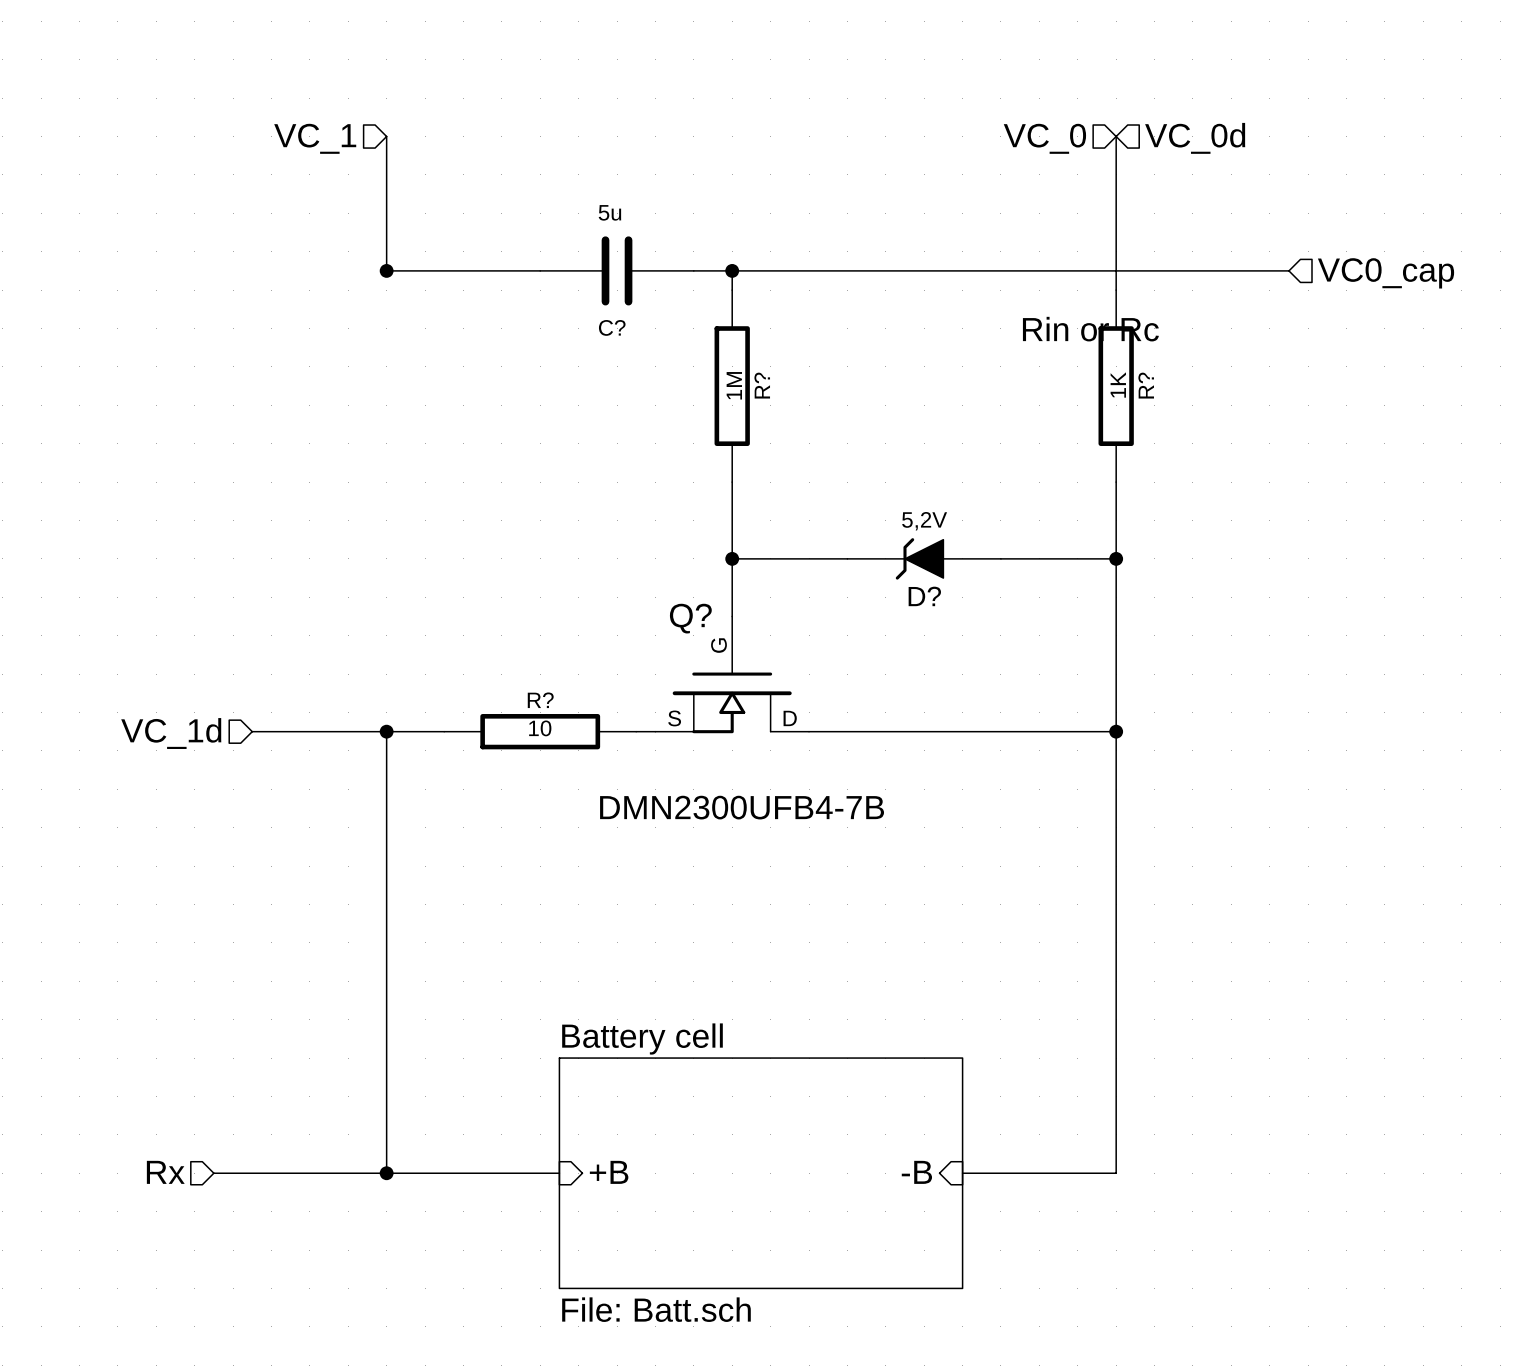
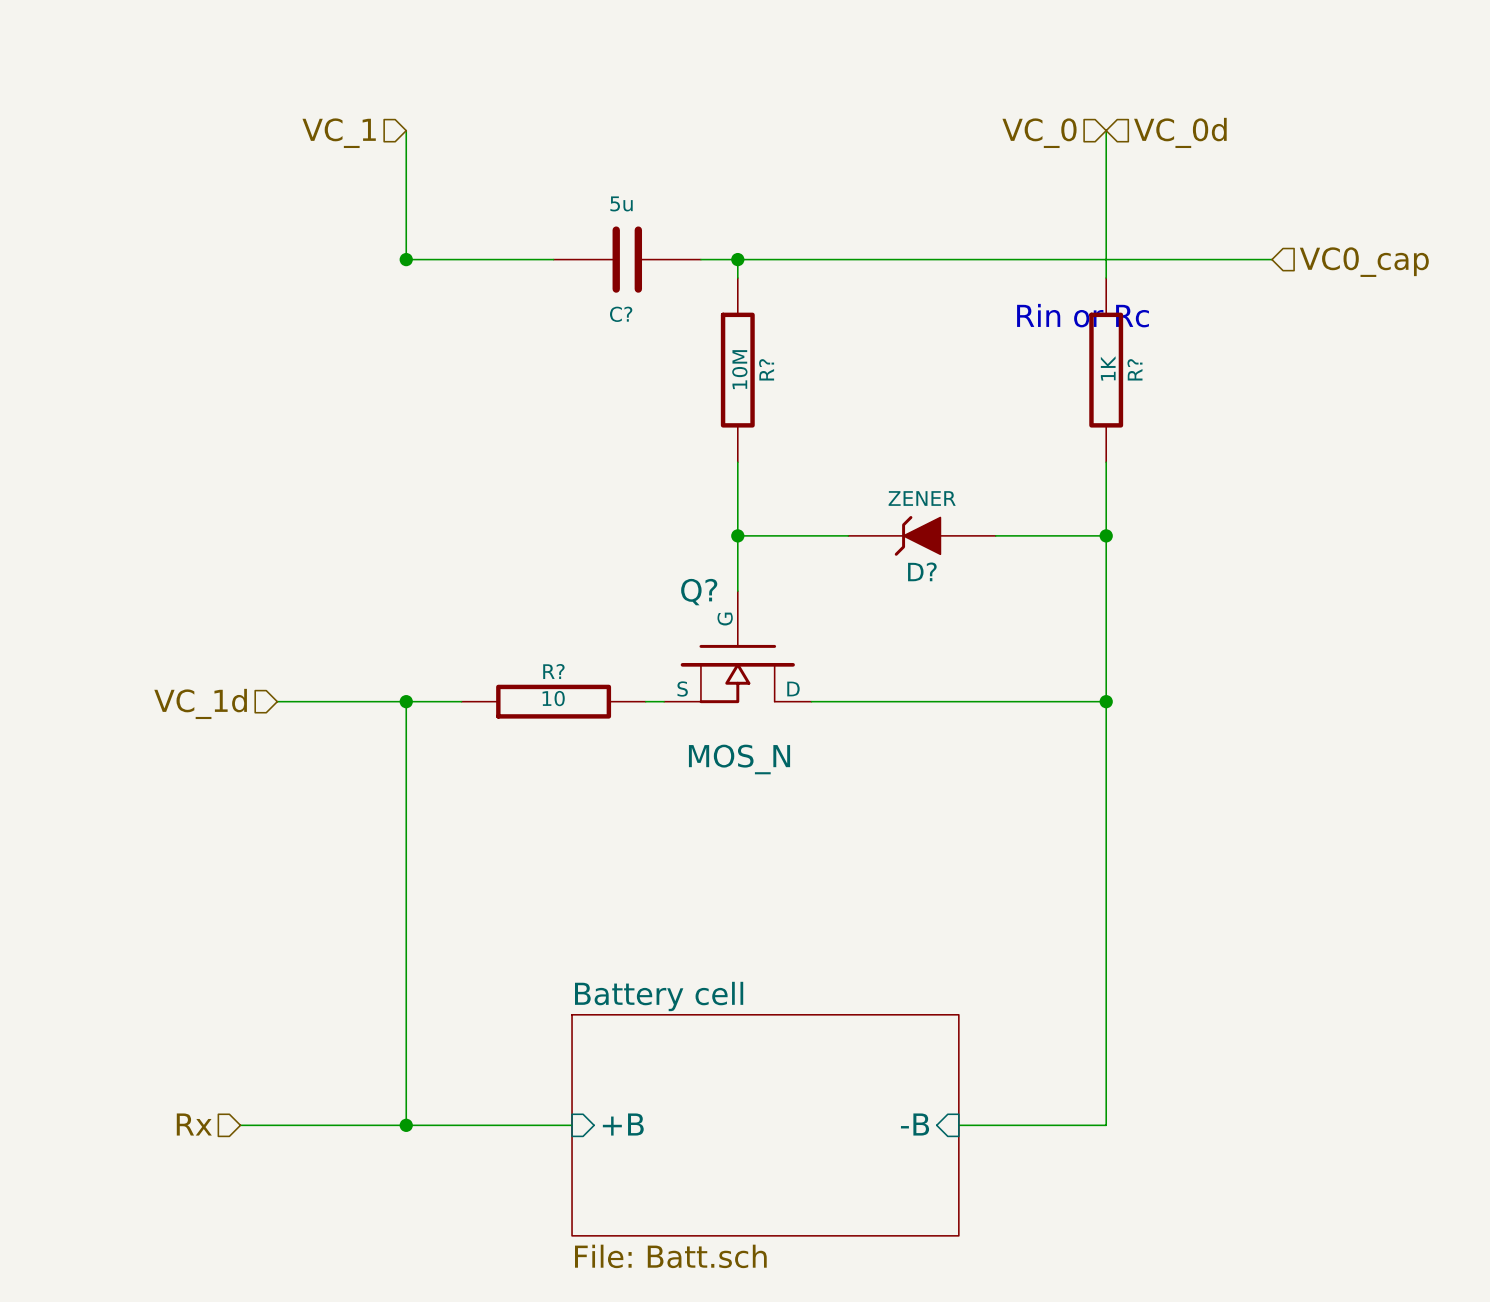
R? value: 1M (734, 385) -> 10M (739, 369)
D? value: 5,2V (924, 521) -> ZENER (922, 498)
Q? value: DMN2300UFB4-7B (742, 807) -> MOS_N (739, 759)

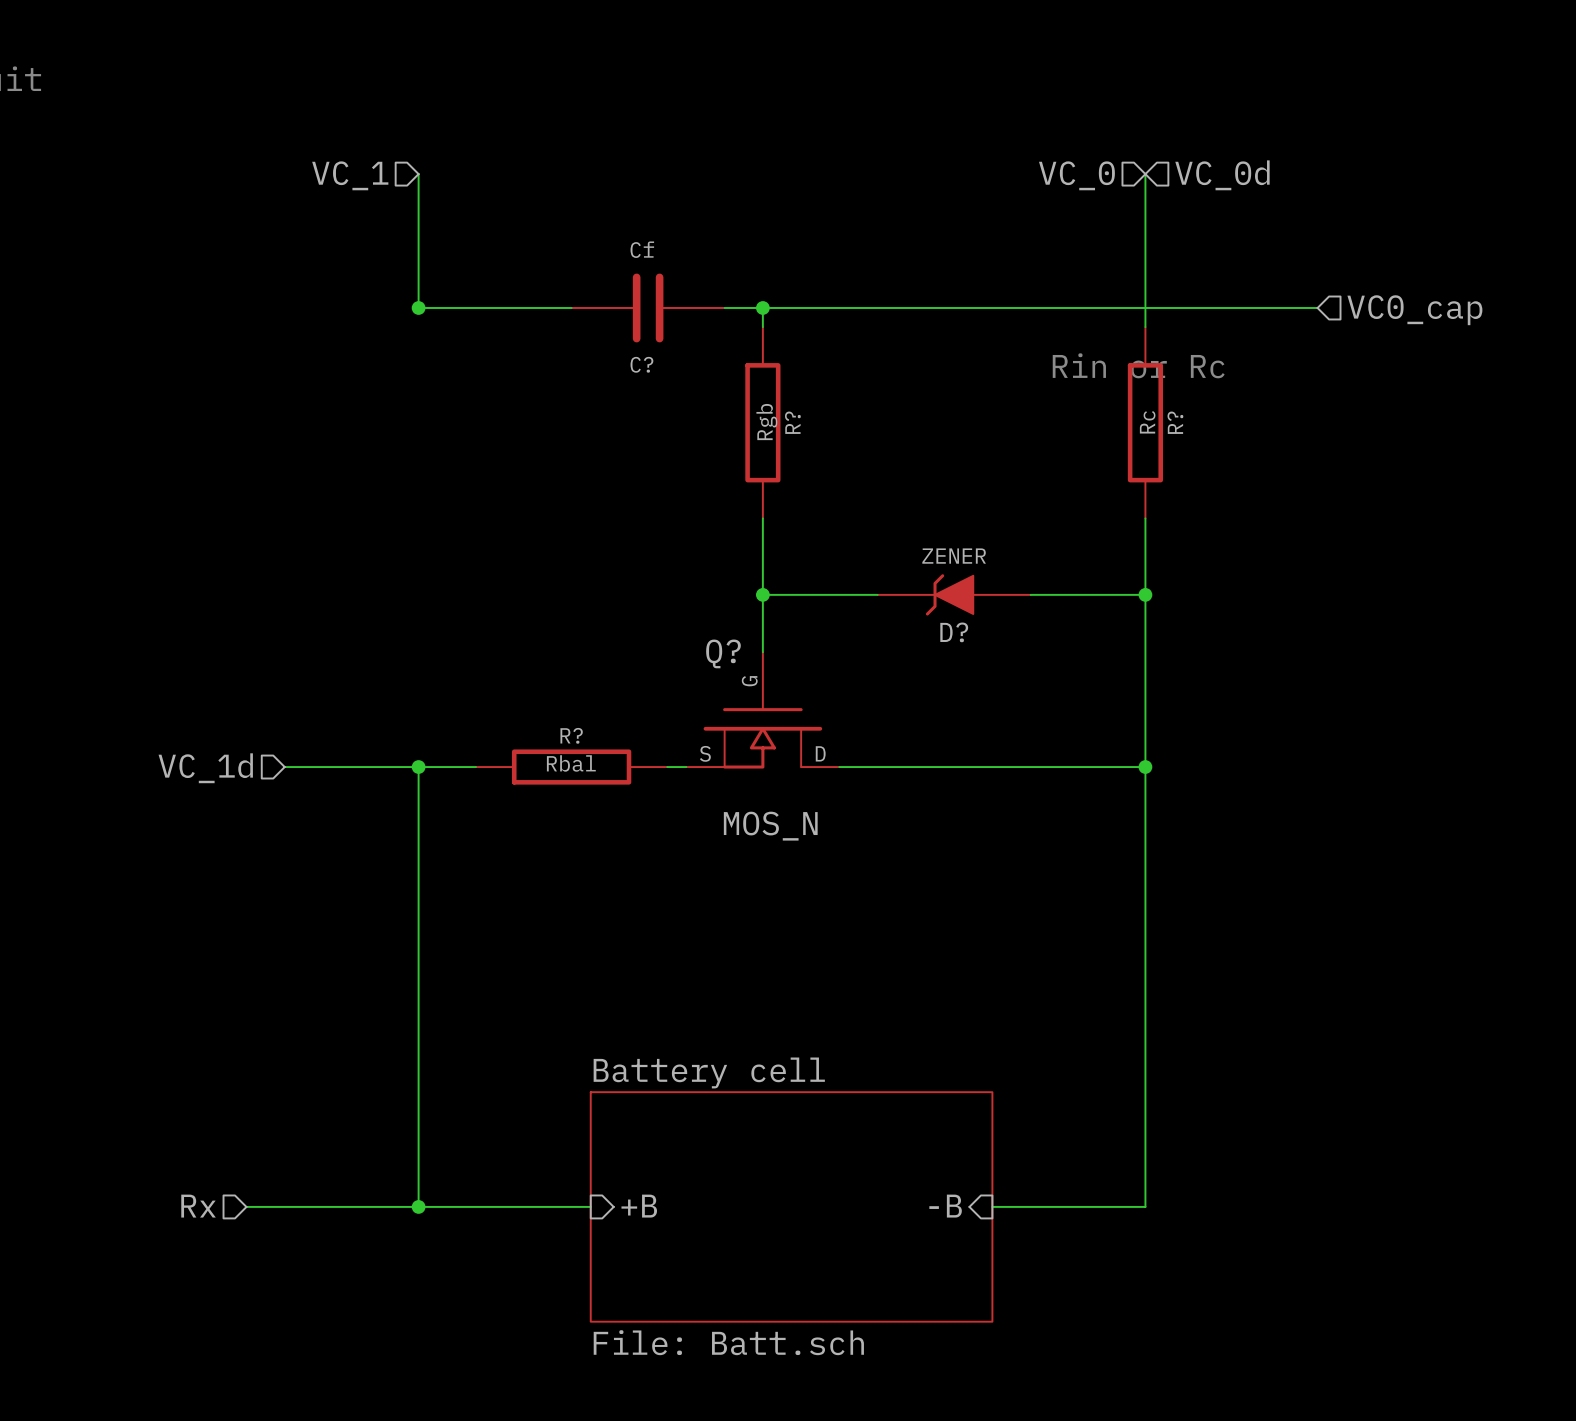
C? value: 5u (621, 203) -> Cf (642, 249)
R? value: 1K (1108, 368) -> Rc (1147, 422)
R? value: 10M (739, 369) -> Rgb (766, 422)
R? value: 10 (553, 698) -> Rbal (571, 763)

